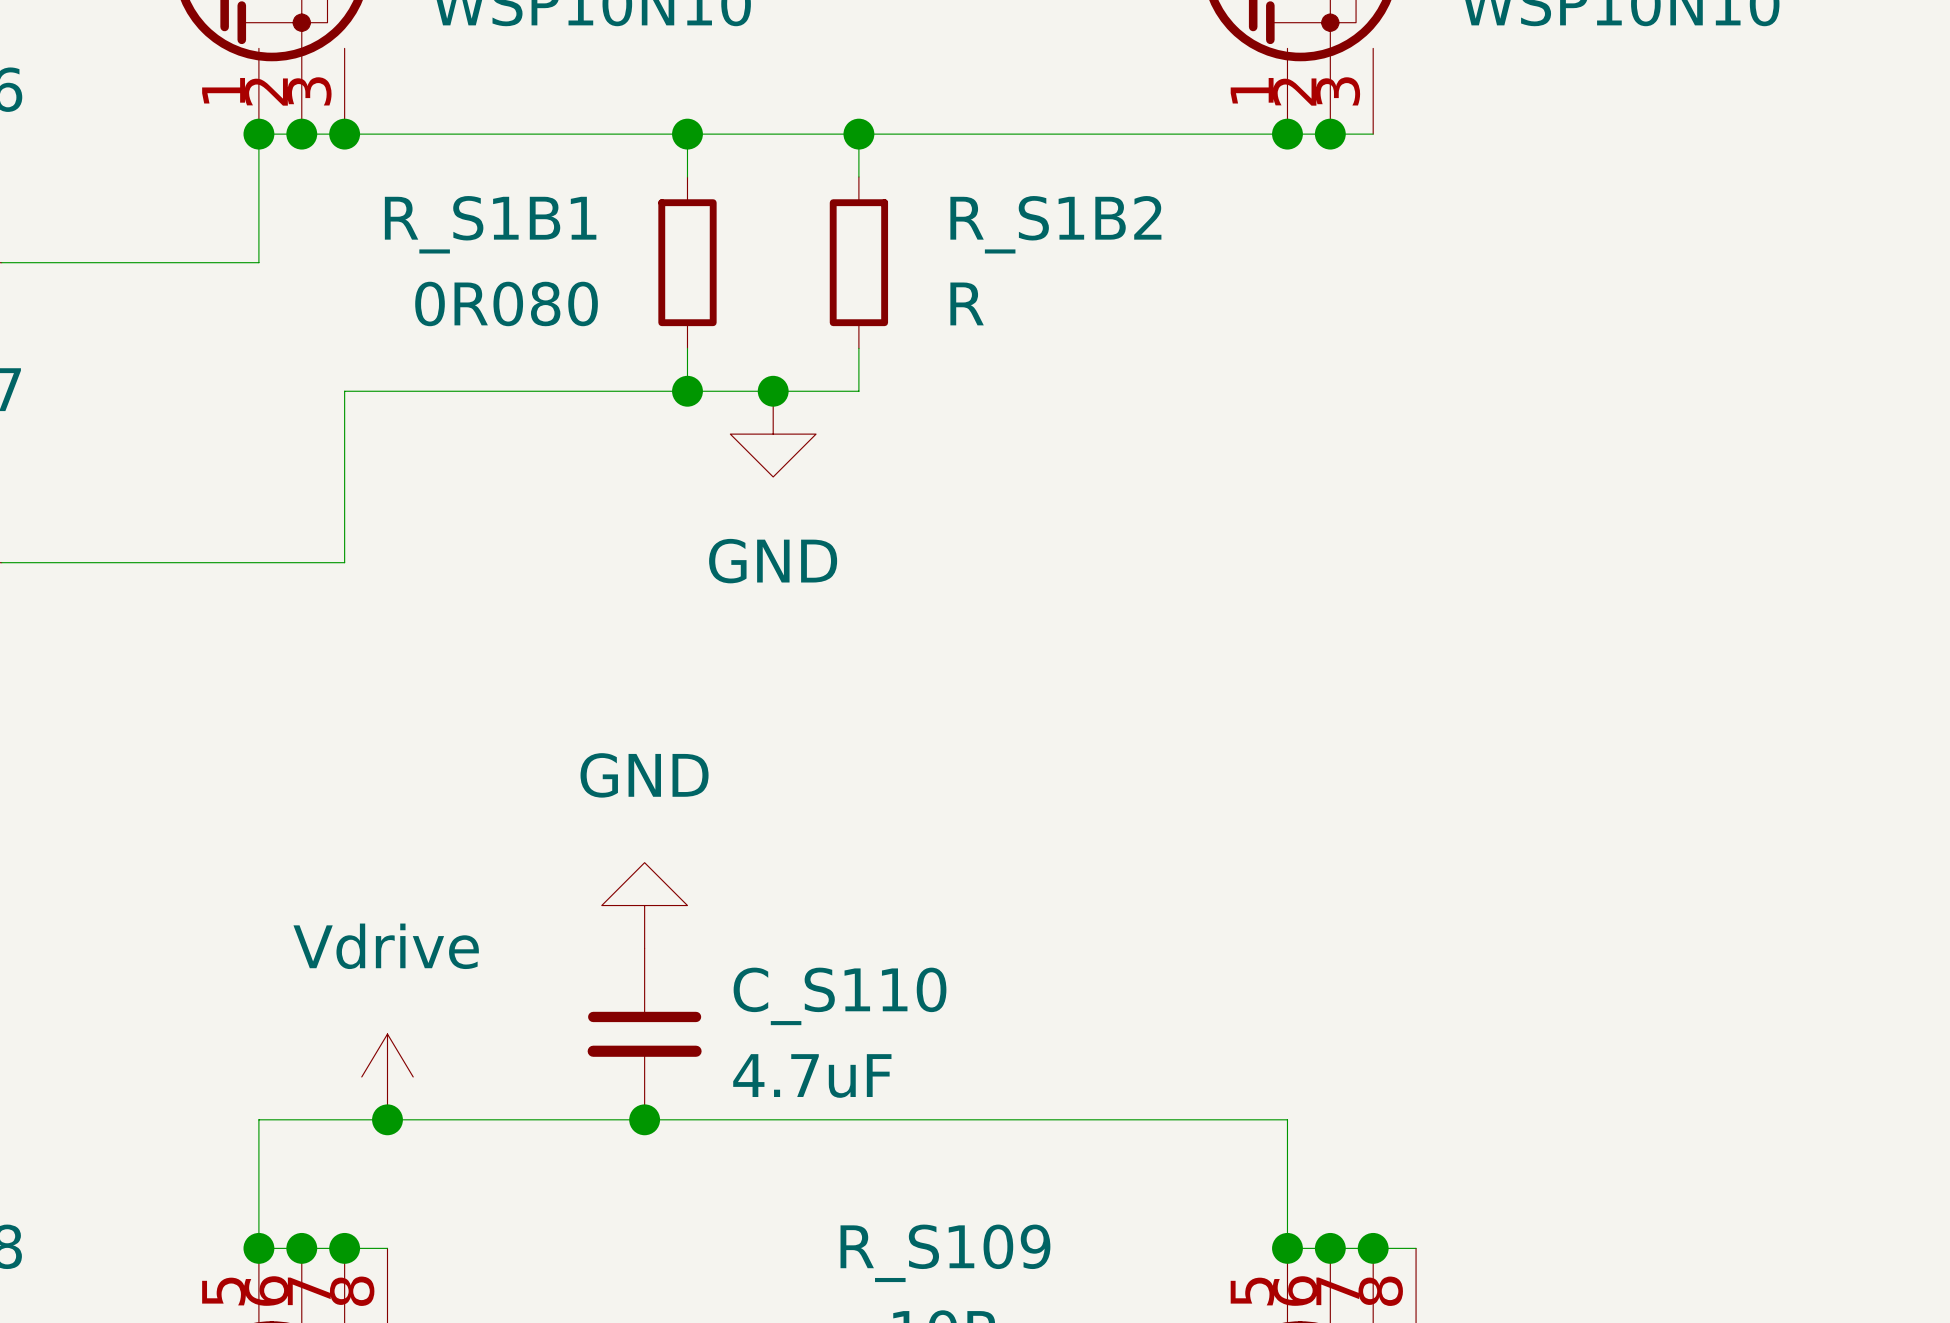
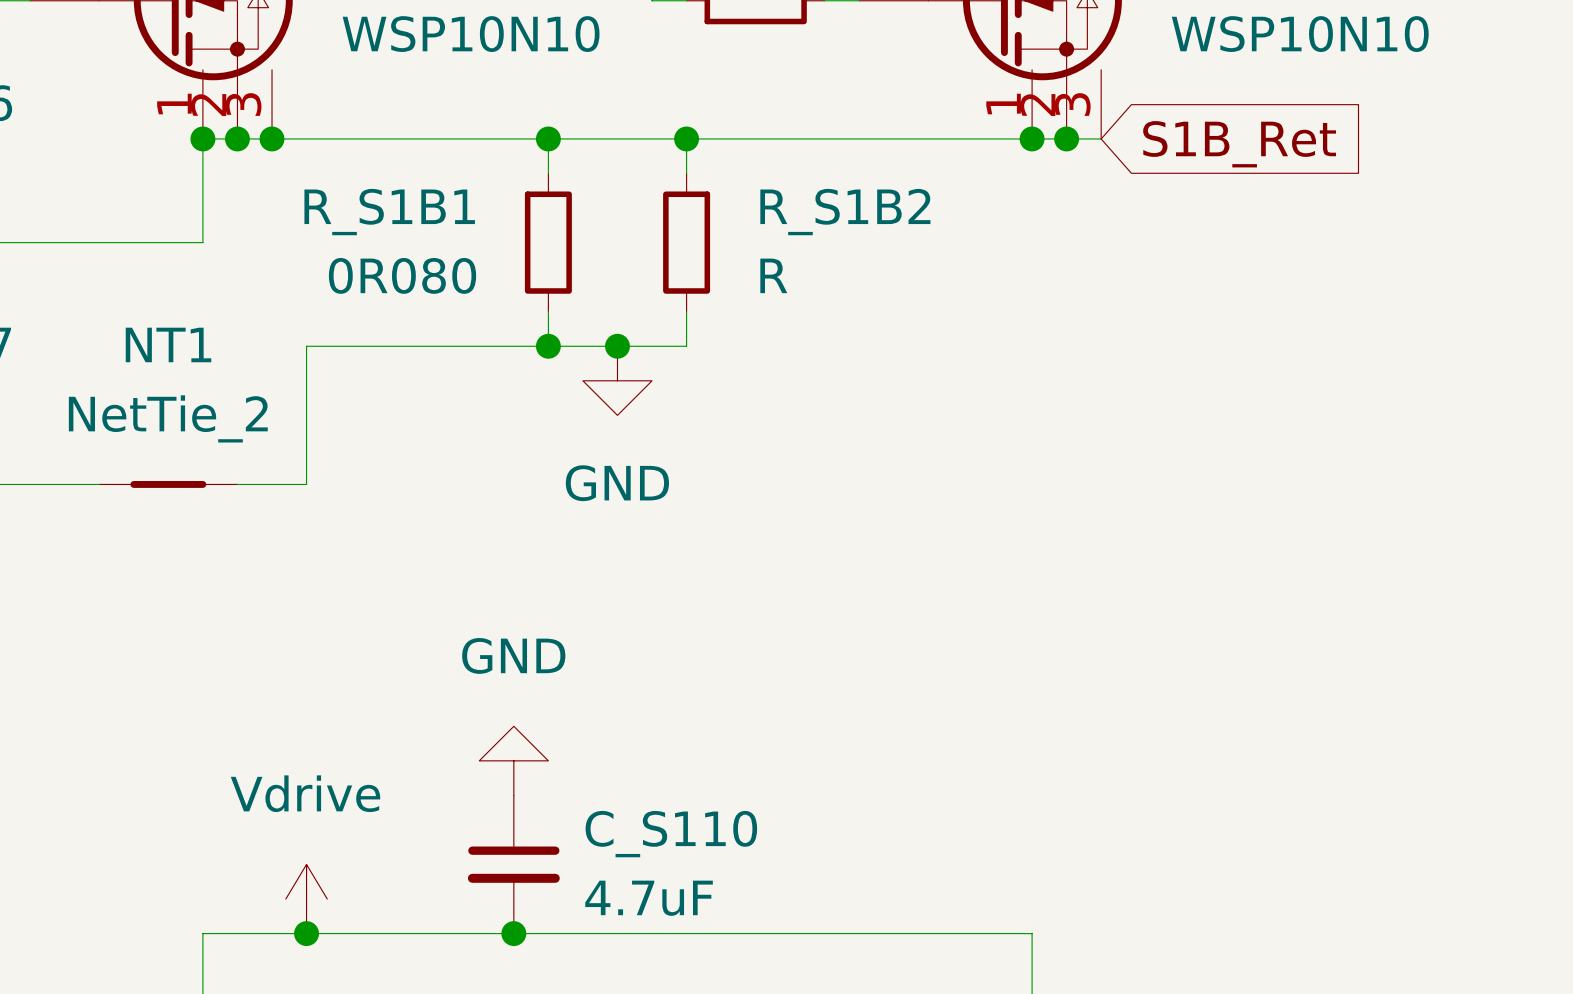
global label: none -> S1B_Ret (1239, 144)
wire: (387, 391) (344, 391) (344, 562) -> (306, 346) (306, 484) (272, 484)
NT1: none -> NetTie_2 (168, 484)

